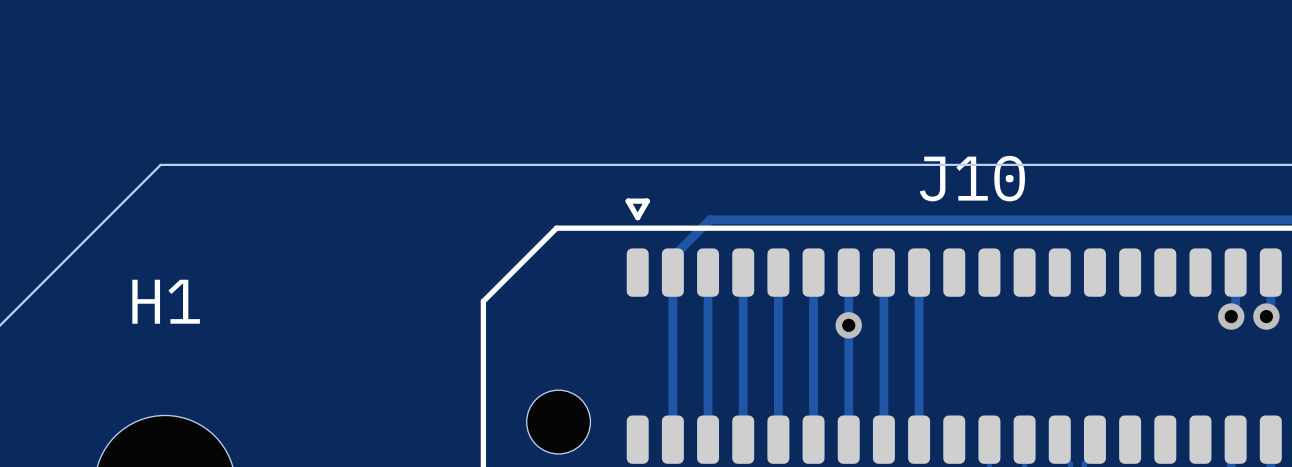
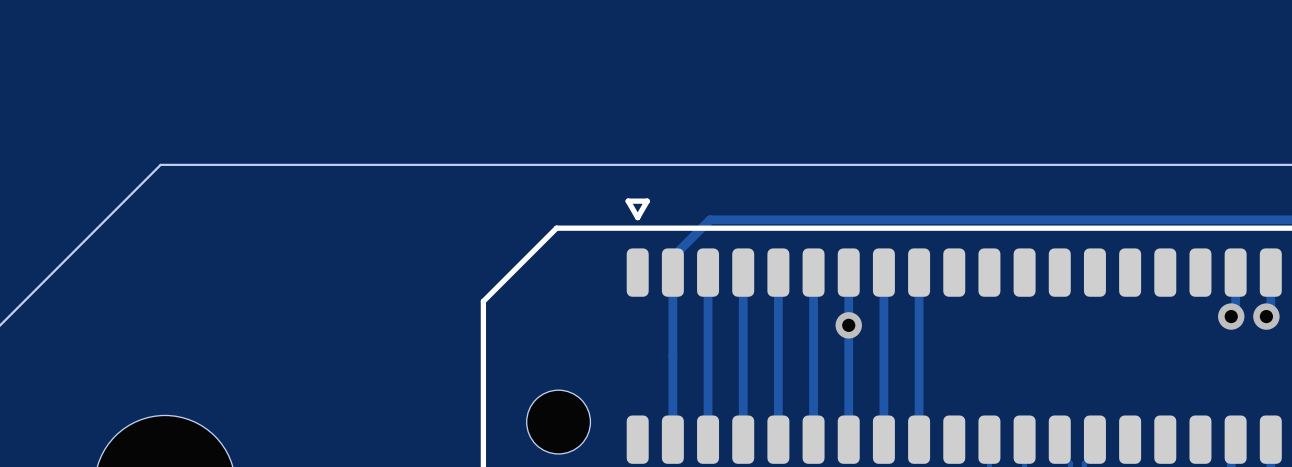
J10 name: J10 (972, 178) -> none
H1 name: H1 (166, 301) -> none

